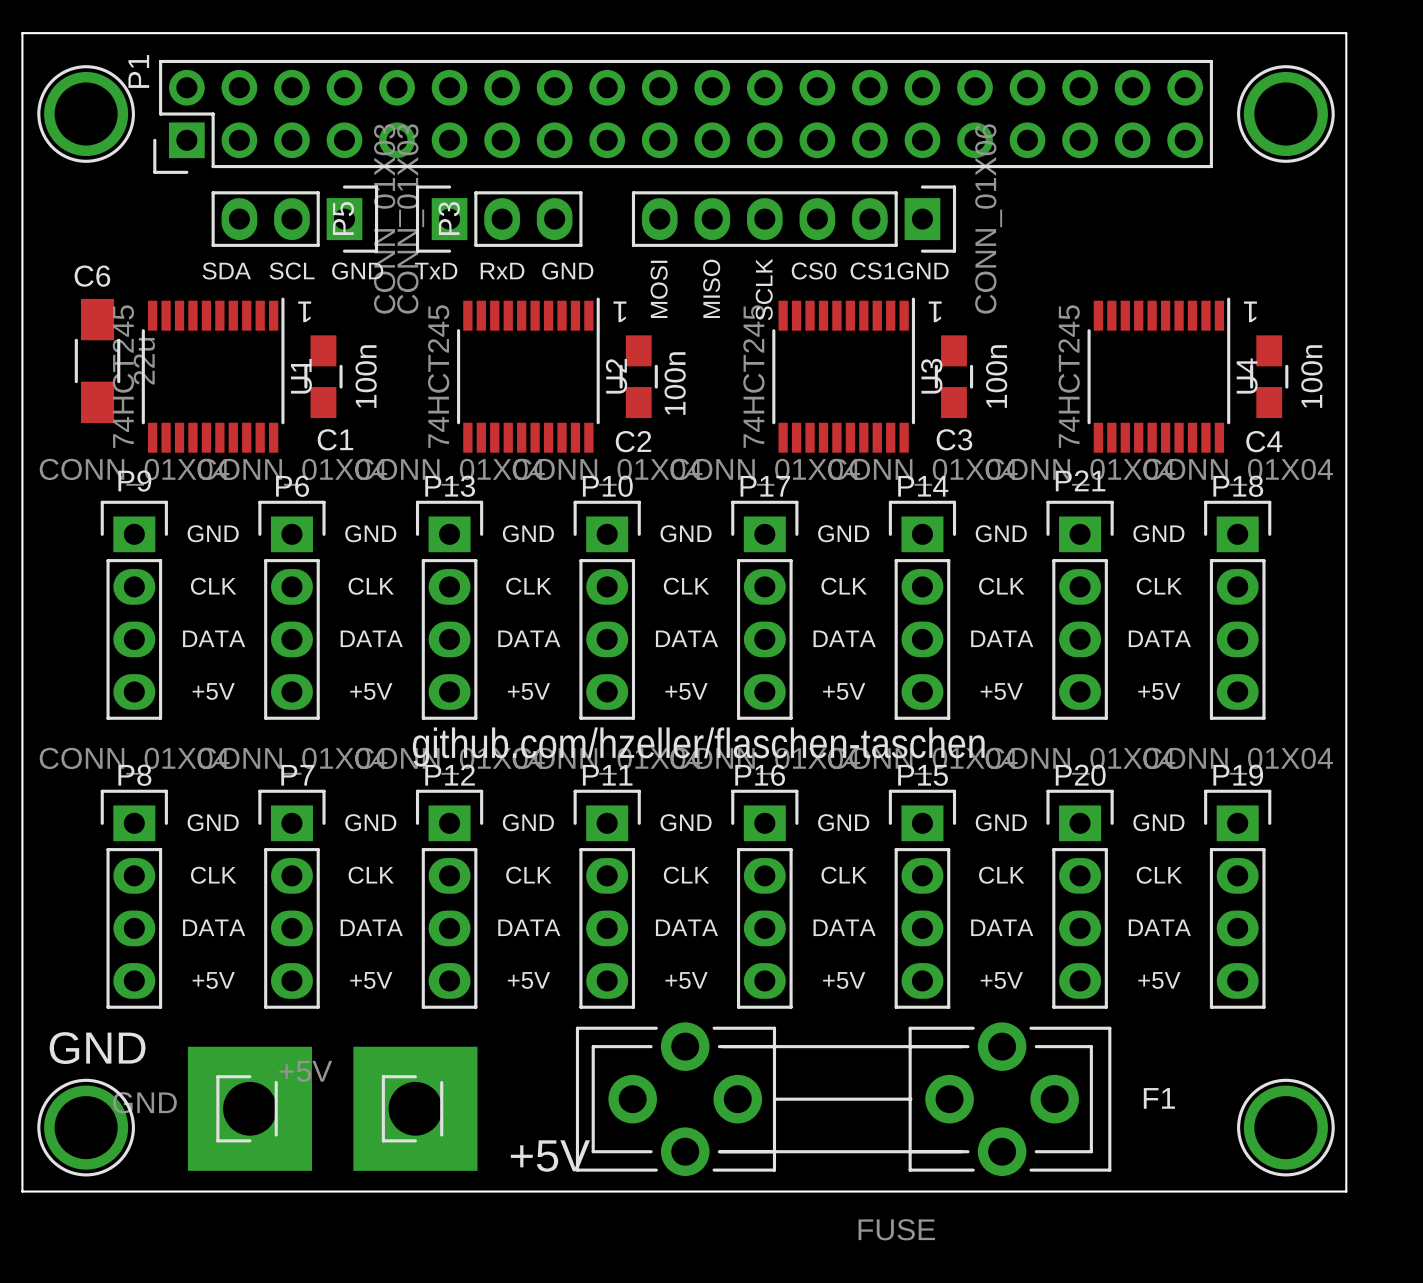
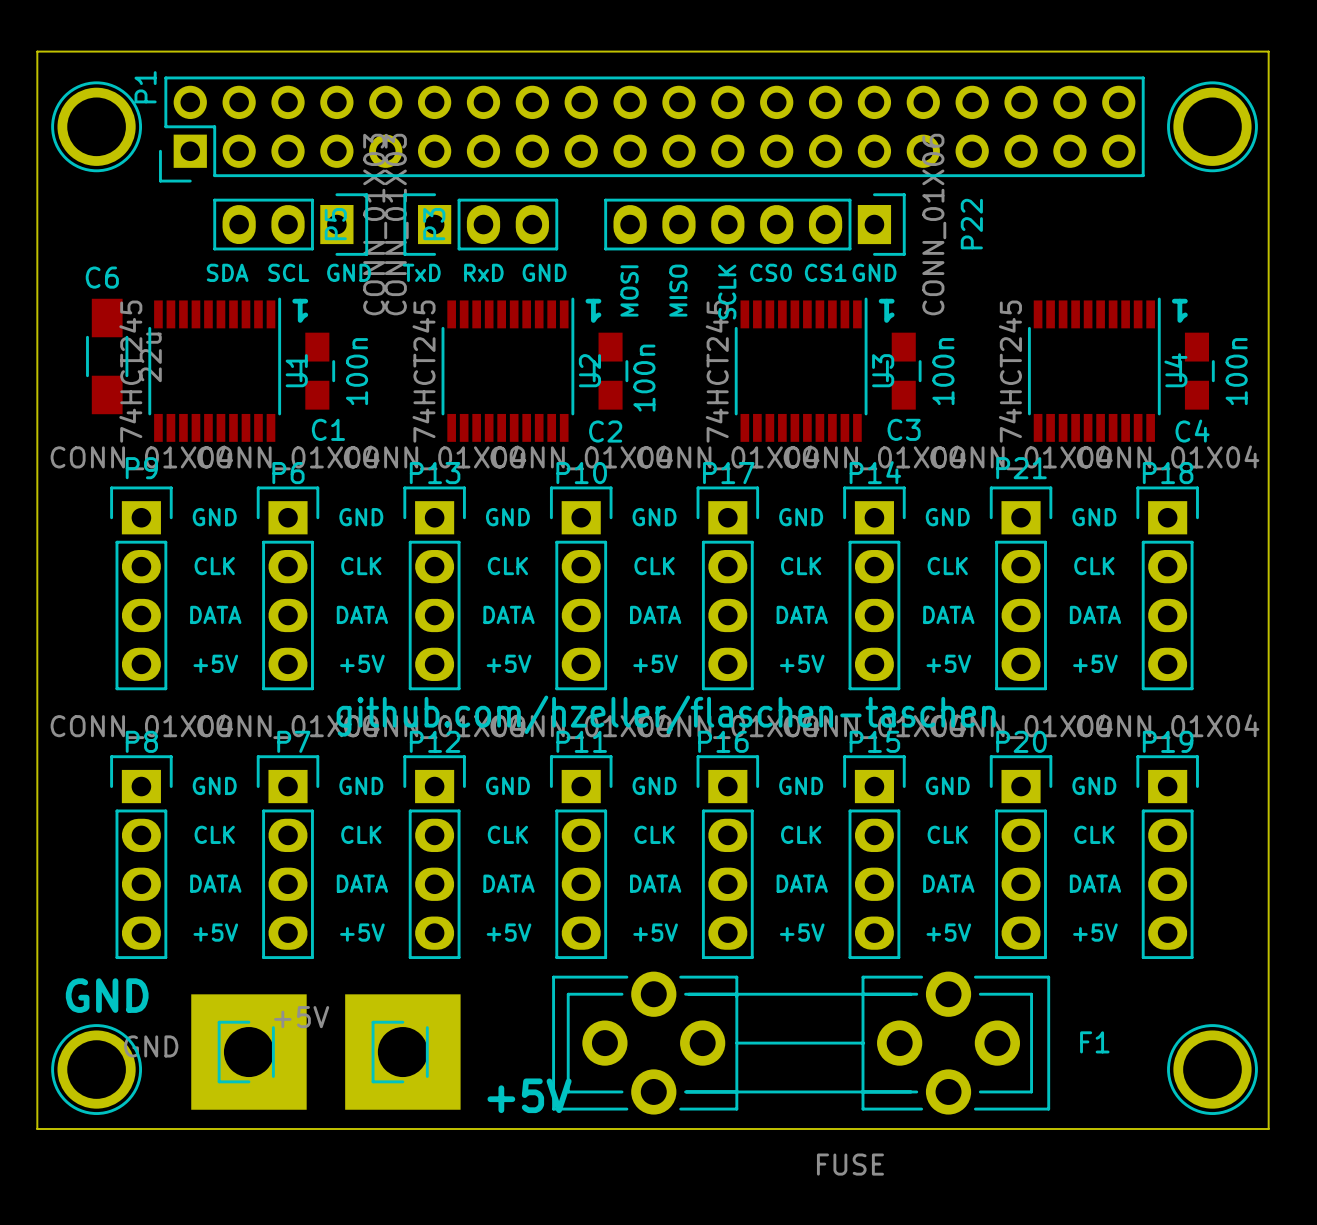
P22 name: none -> P22 (971, 224)

